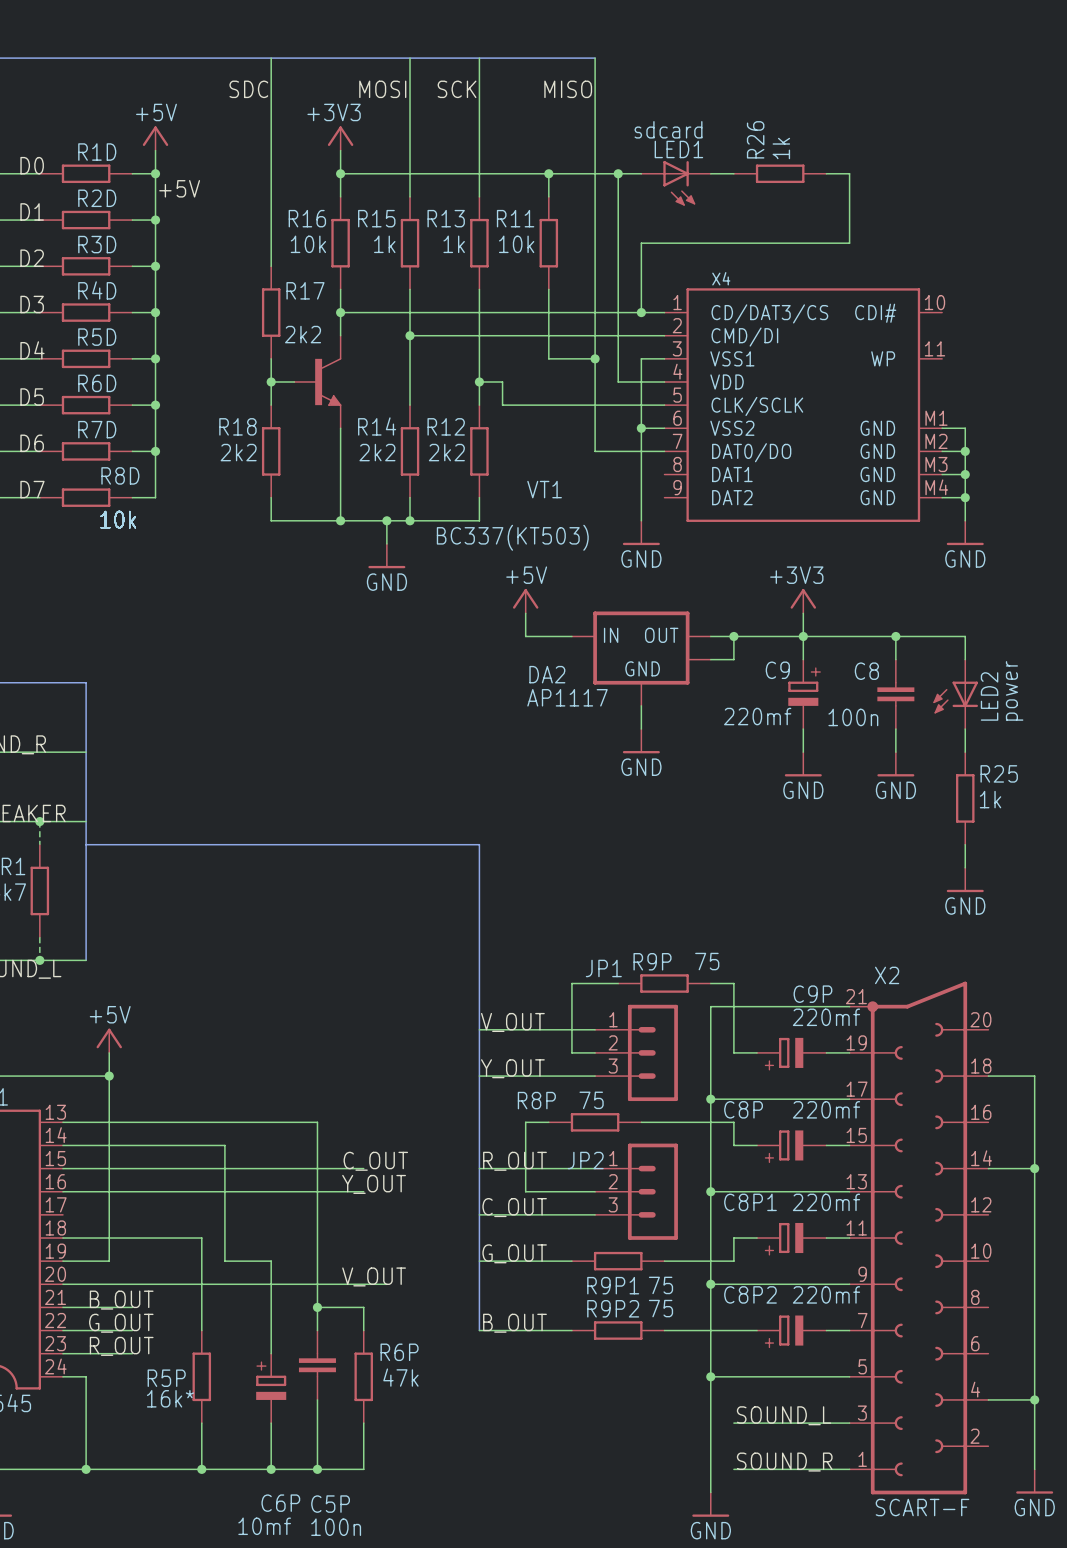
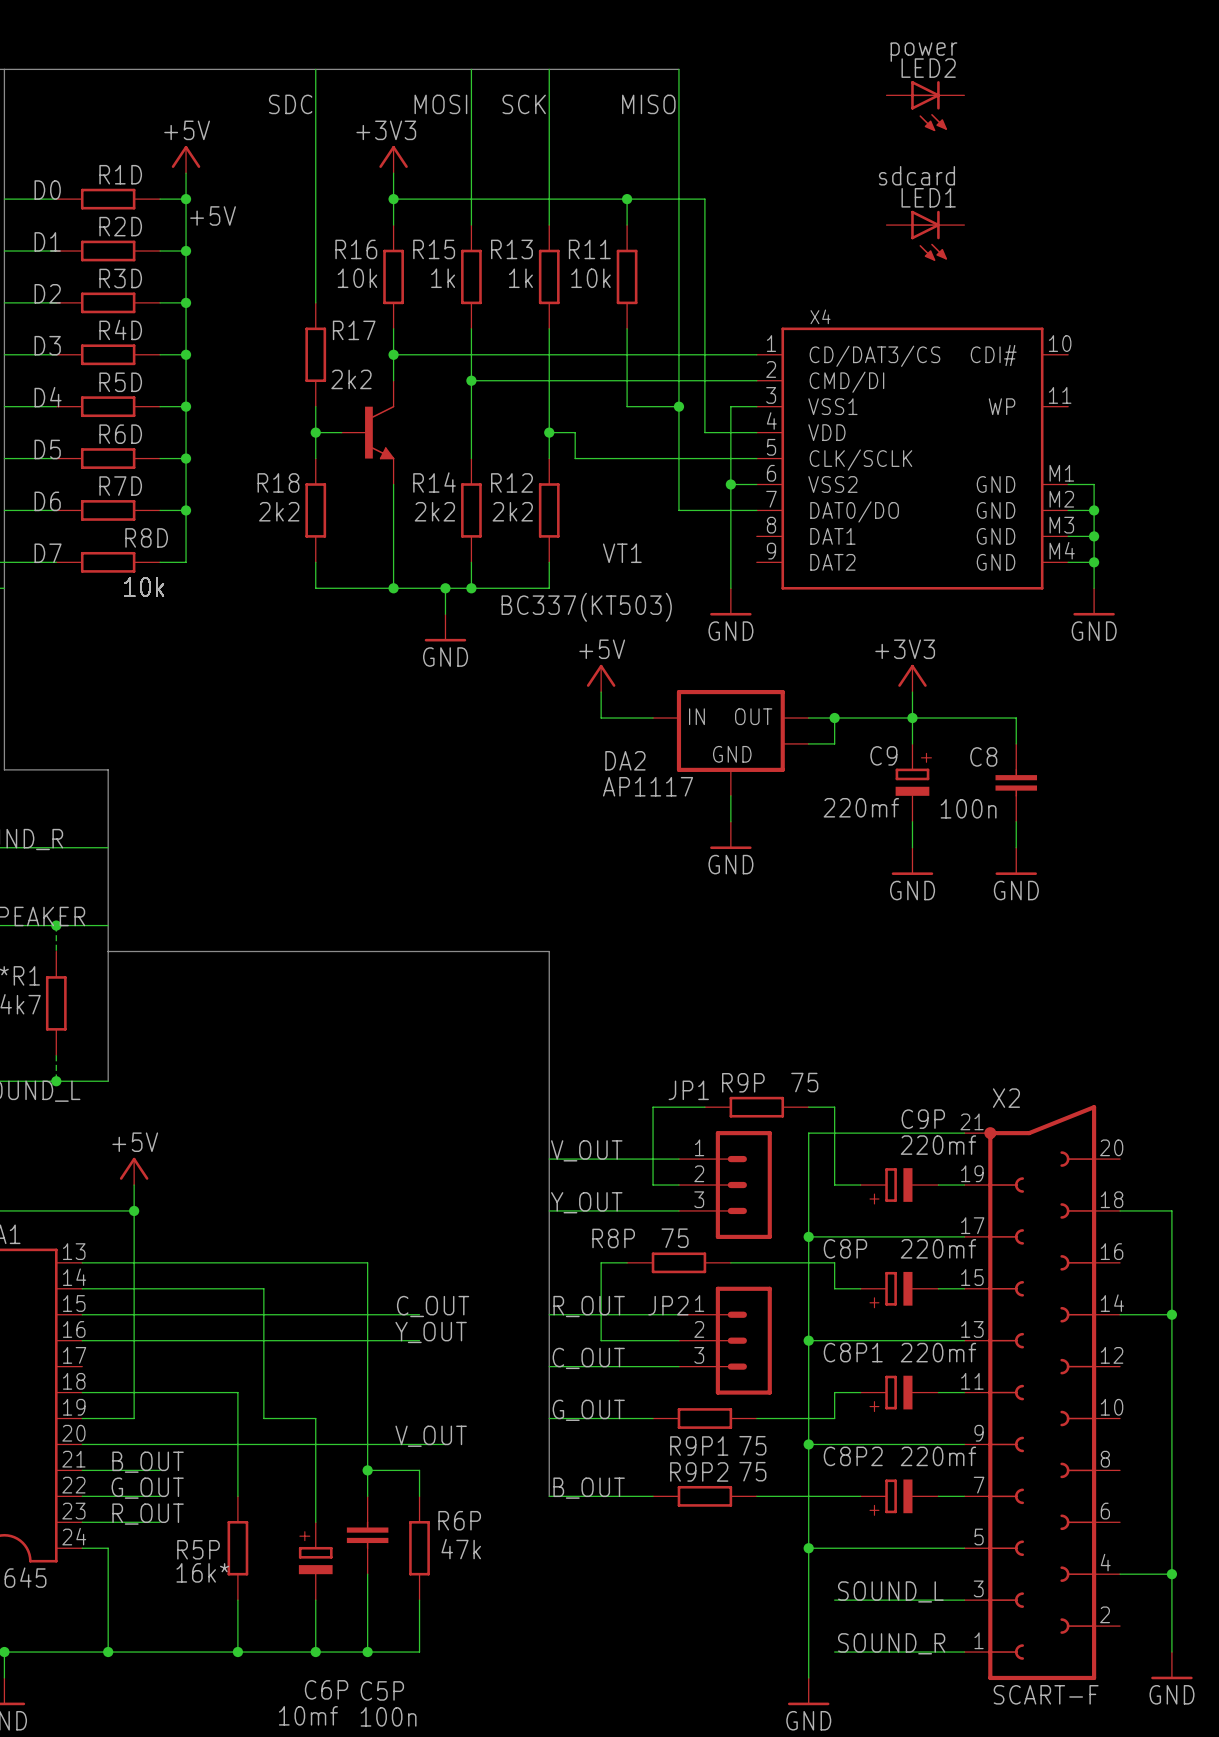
wire: (618, 173) (641, 173) -> none
junction: (618, 173) -> none
wire: (710, 173) (733, 173) -> none
R26: 1k (780, 173) -> none
wire: (826, 173) (849, 173) (849, 243) (641, 243) (641, 312) -> none
LED1 position: (676, 183) -> (925, 235)
junction: (641, 312) -> none
wire: (895, 636) (965, 636) (965, 659) -> none
junction: (895, 636) -> none
LED2 position: (955, 694) -> (925, 106)
LED2 rotation: 0° (955, 697) -> 90° counterclockwise (929, 106)
wire: (965, 729) (965, 752) -> none
R25: 1k (965, 798) -> none
wire: (965, 844) (965, 867) -> none
power symbol: GND (965, 879) -> none

